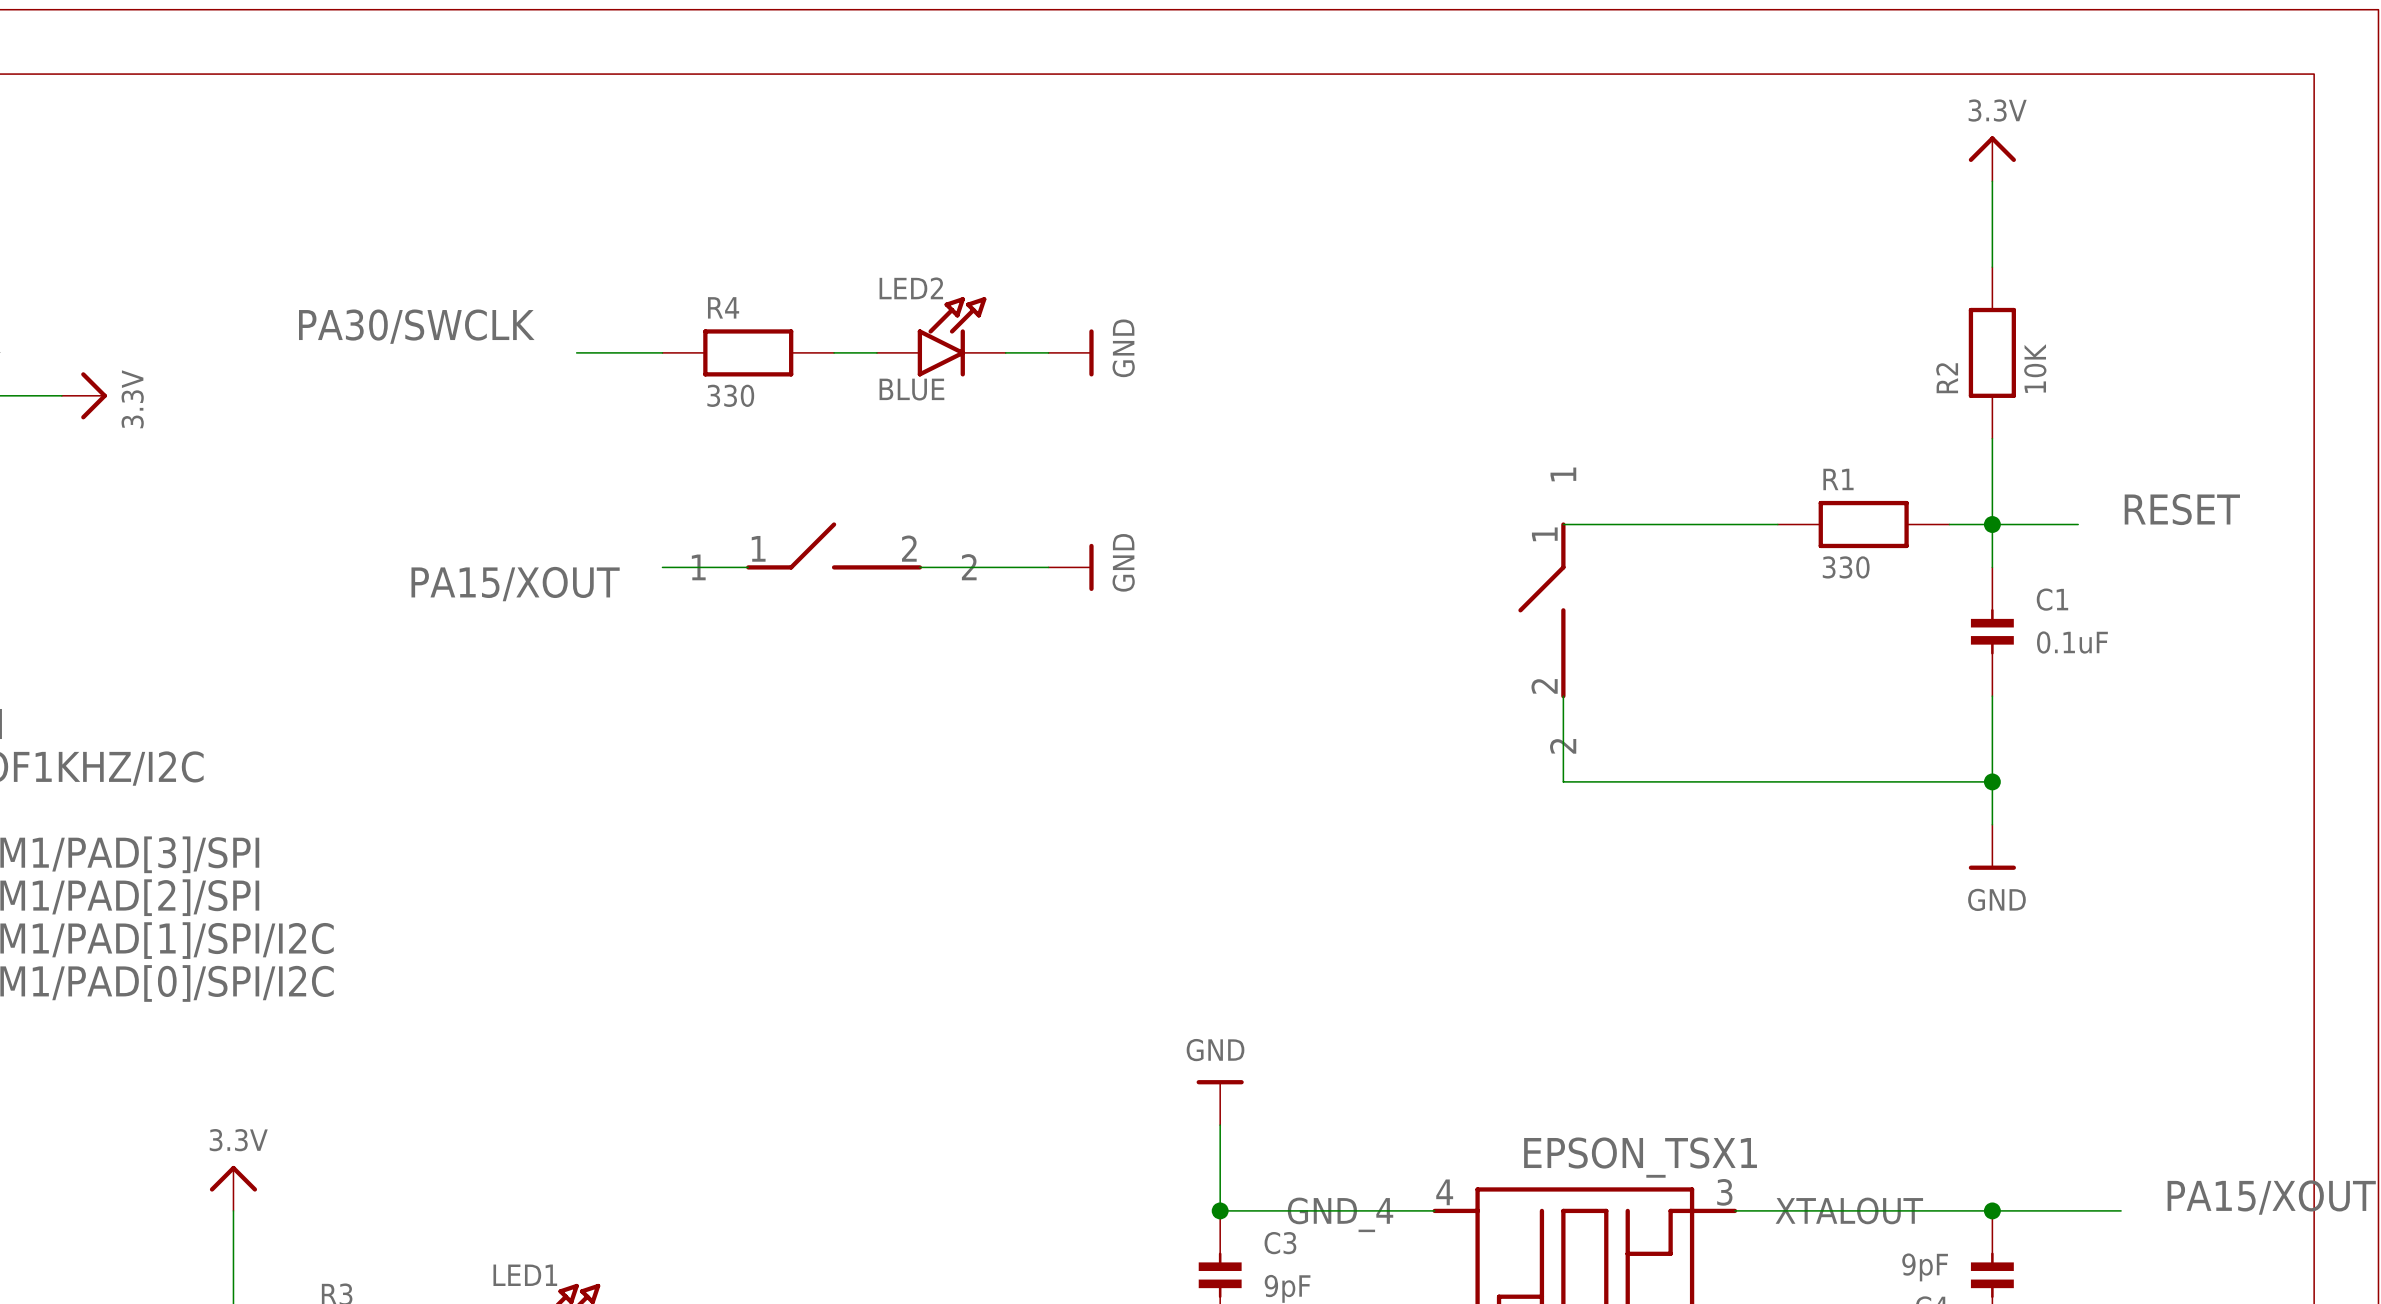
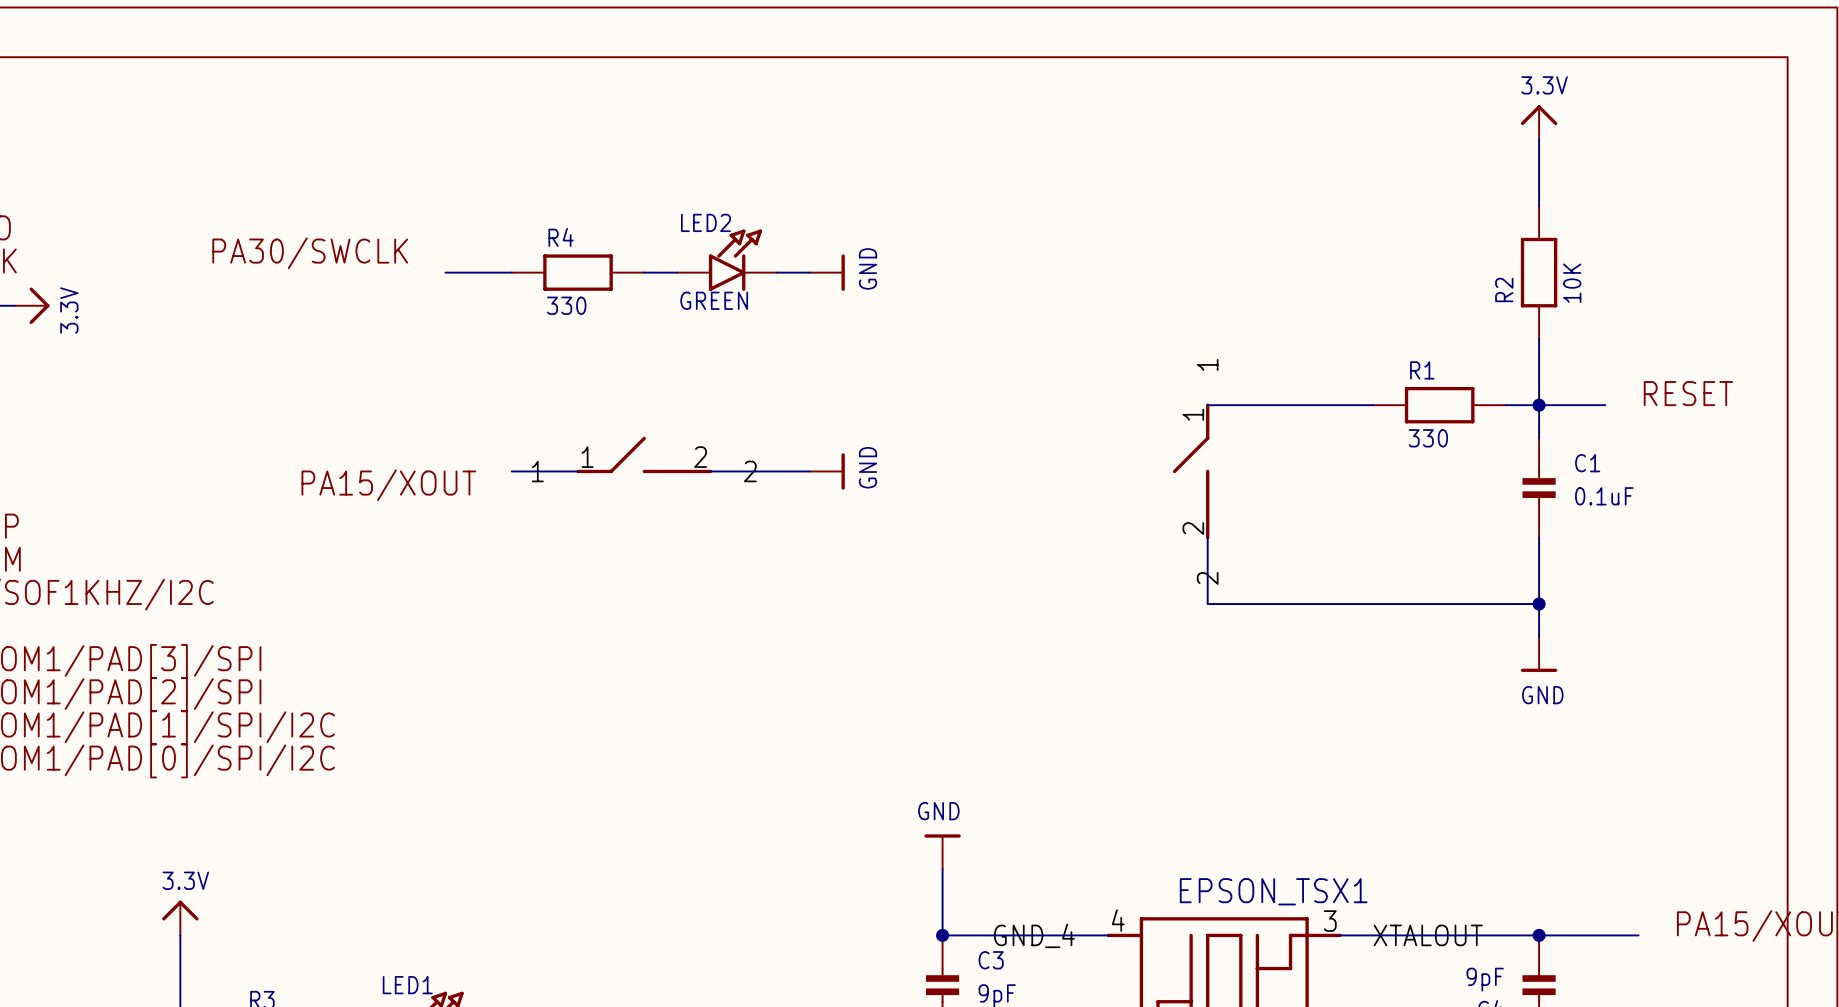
LED2 value: BLUE (911, 389) -> GREEN (714, 300)
power symbol position: 3.3V (84, 395) -> 3.3V (32, 305)
part position: (834, 545) -> (644, 454)
wire: (662, 567) (748, 567) -> (511, 471) (578, 471)
wire: (919, 567) (1048, 567) -> (710, 471) (810, 471)
power symbol position: GND (1071, 567) -> GND (827, 471)
label position: PA15/XOUT (515, 584) -> PA15/XOUT (388, 485)

